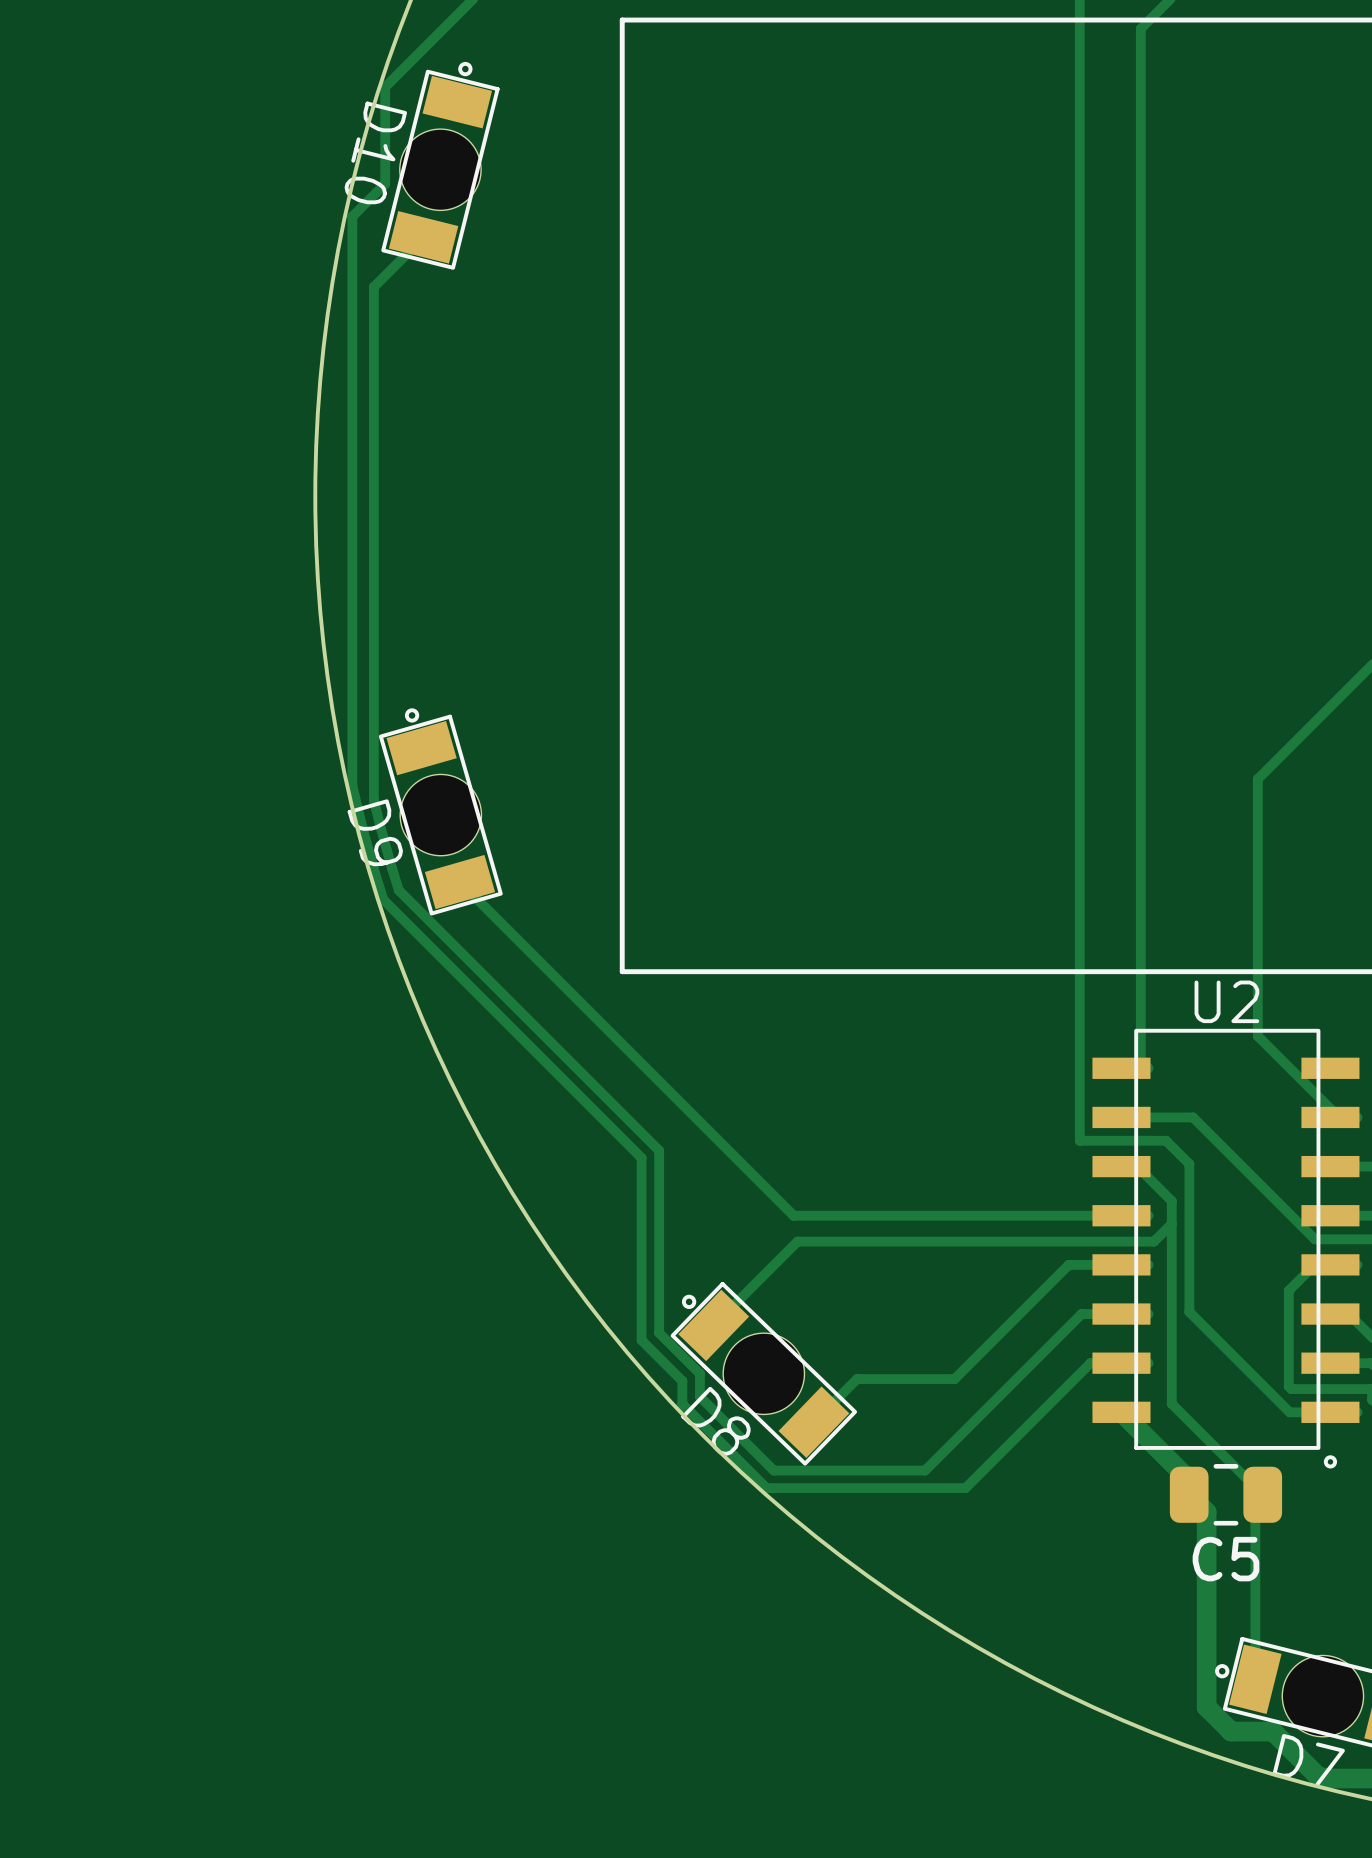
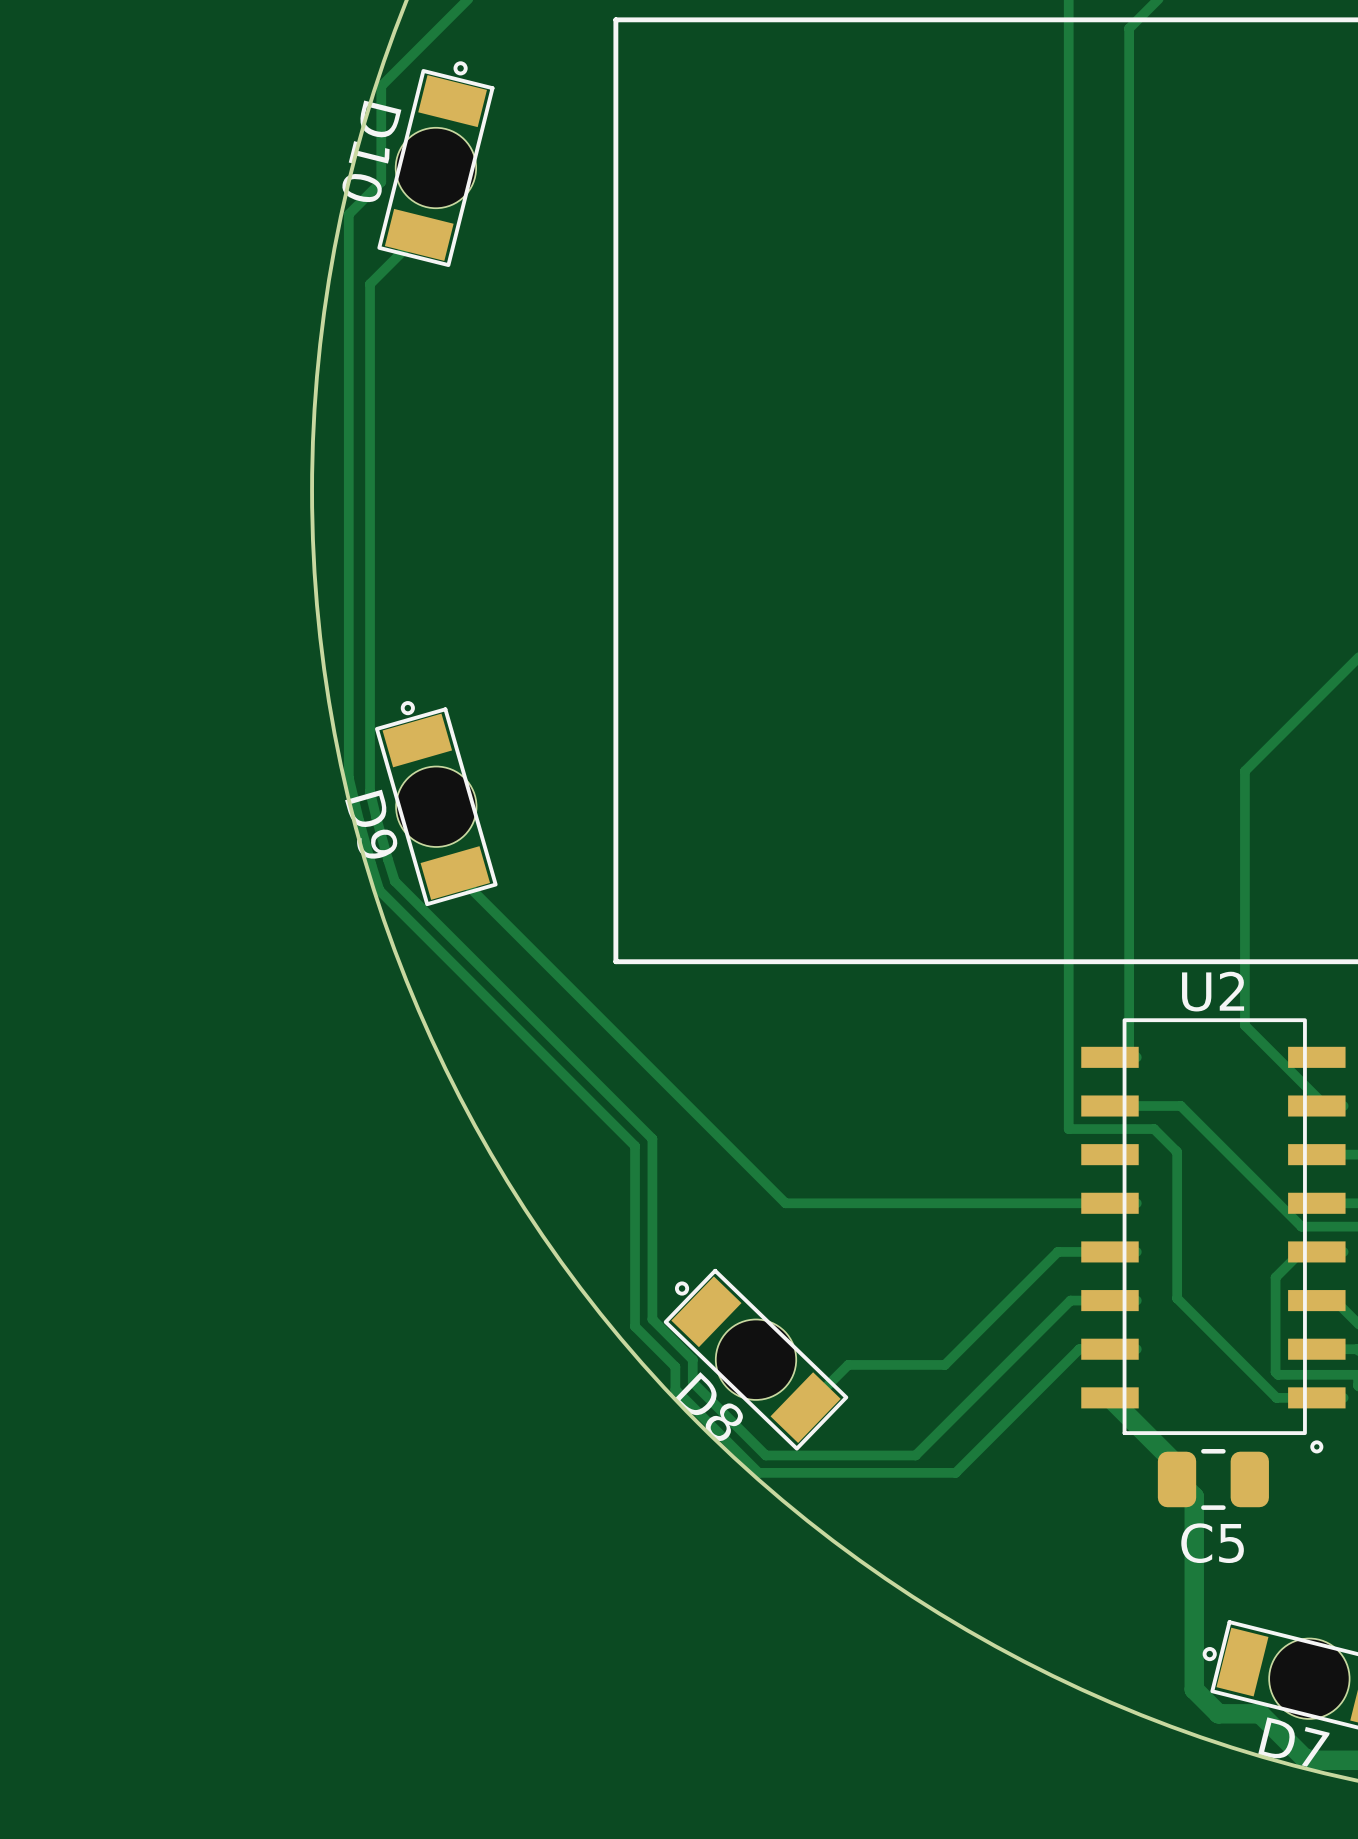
track: (1121, 1166) (1137, 1166) (1171, 1201) (1171, 1403) (1262, 1494) (1255, 1502) (1255, 1679) -> none
track: (1171, 1223) (1154, 1241) (797, 1241) (713, 1325) -> none

